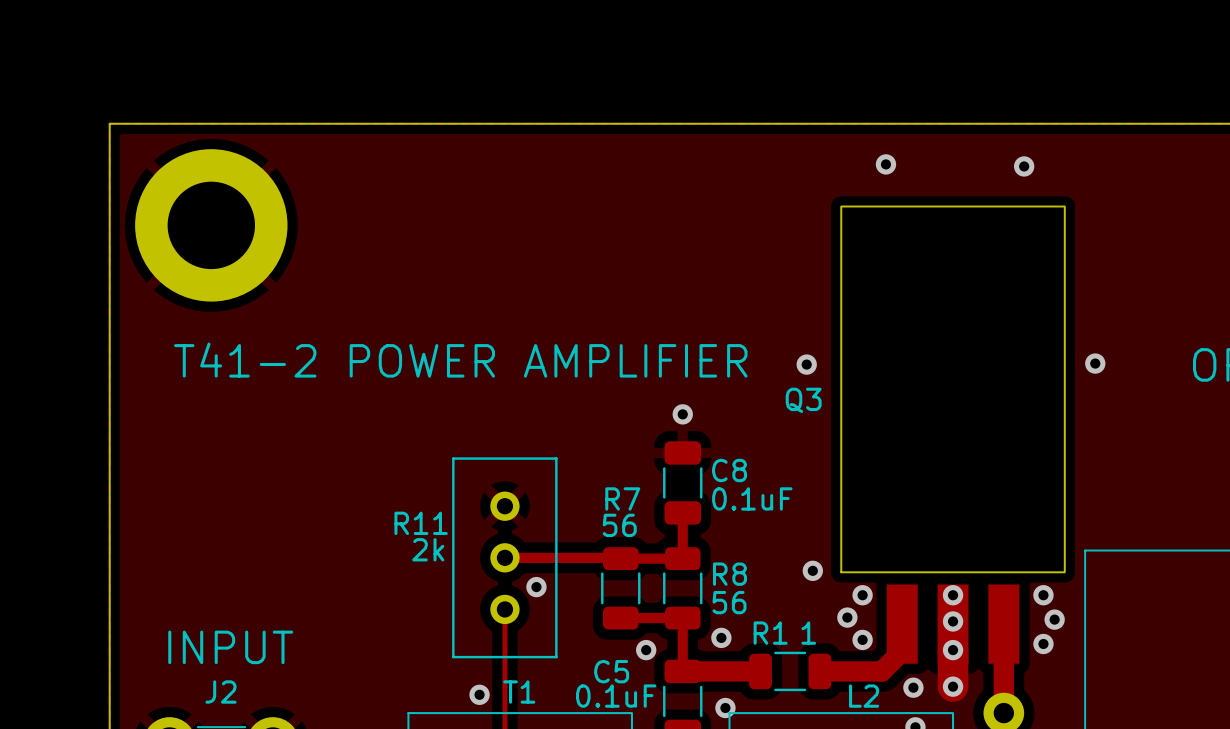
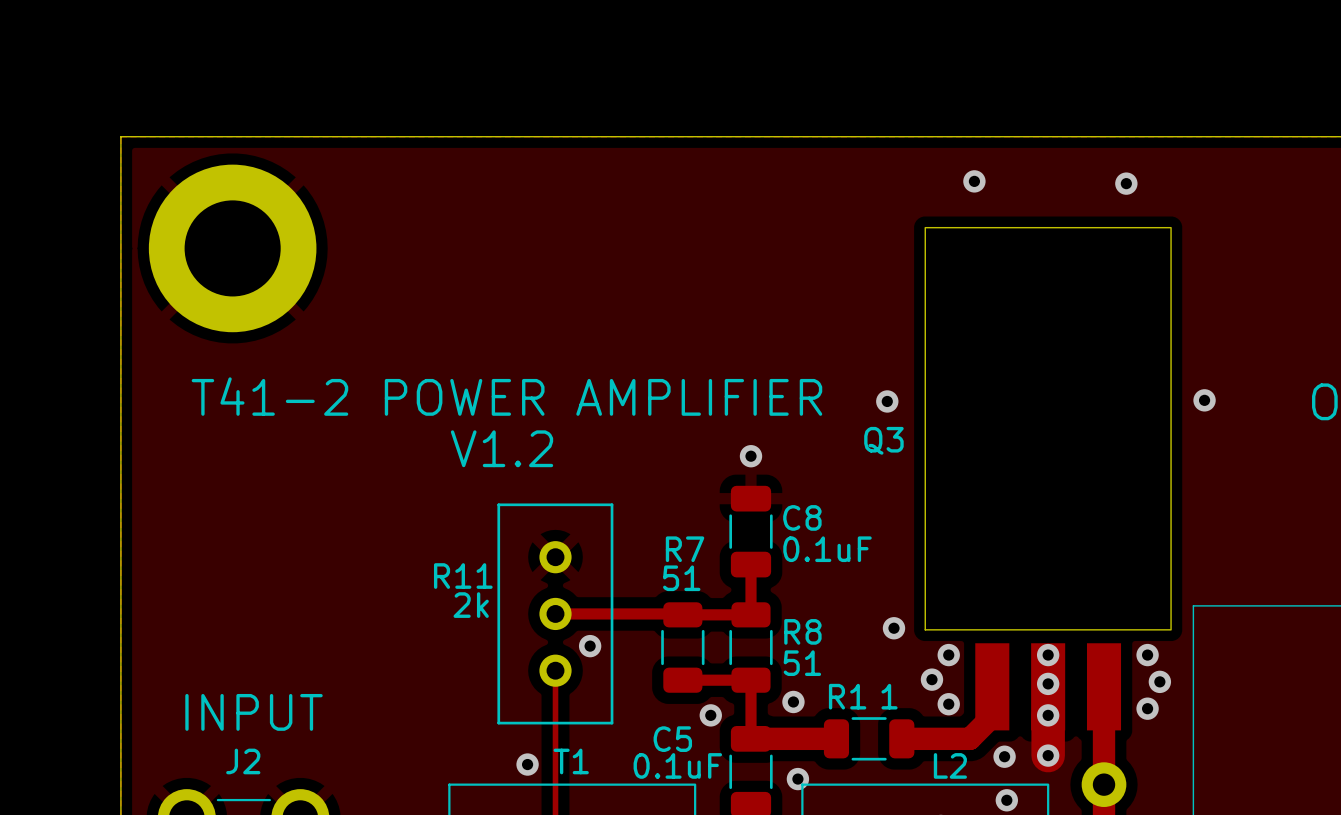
text: none -> V1.2 (502, 448)
R7 value: 56 (619, 525) -> 51 (681, 578)
R8 value: 56 (729, 602) -> 51 (802, 663)

